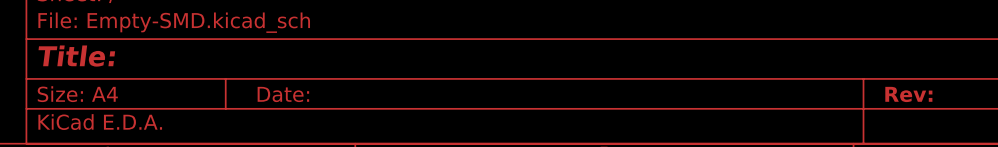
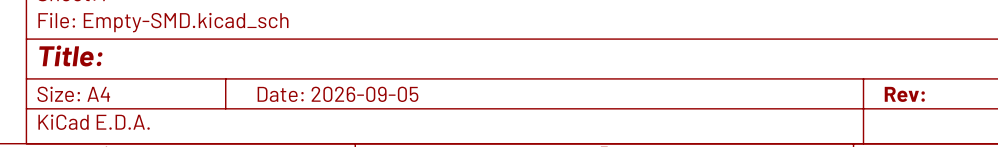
title block: Date: (283, 94) -> Date: 2026-09-05 (337, 94)

